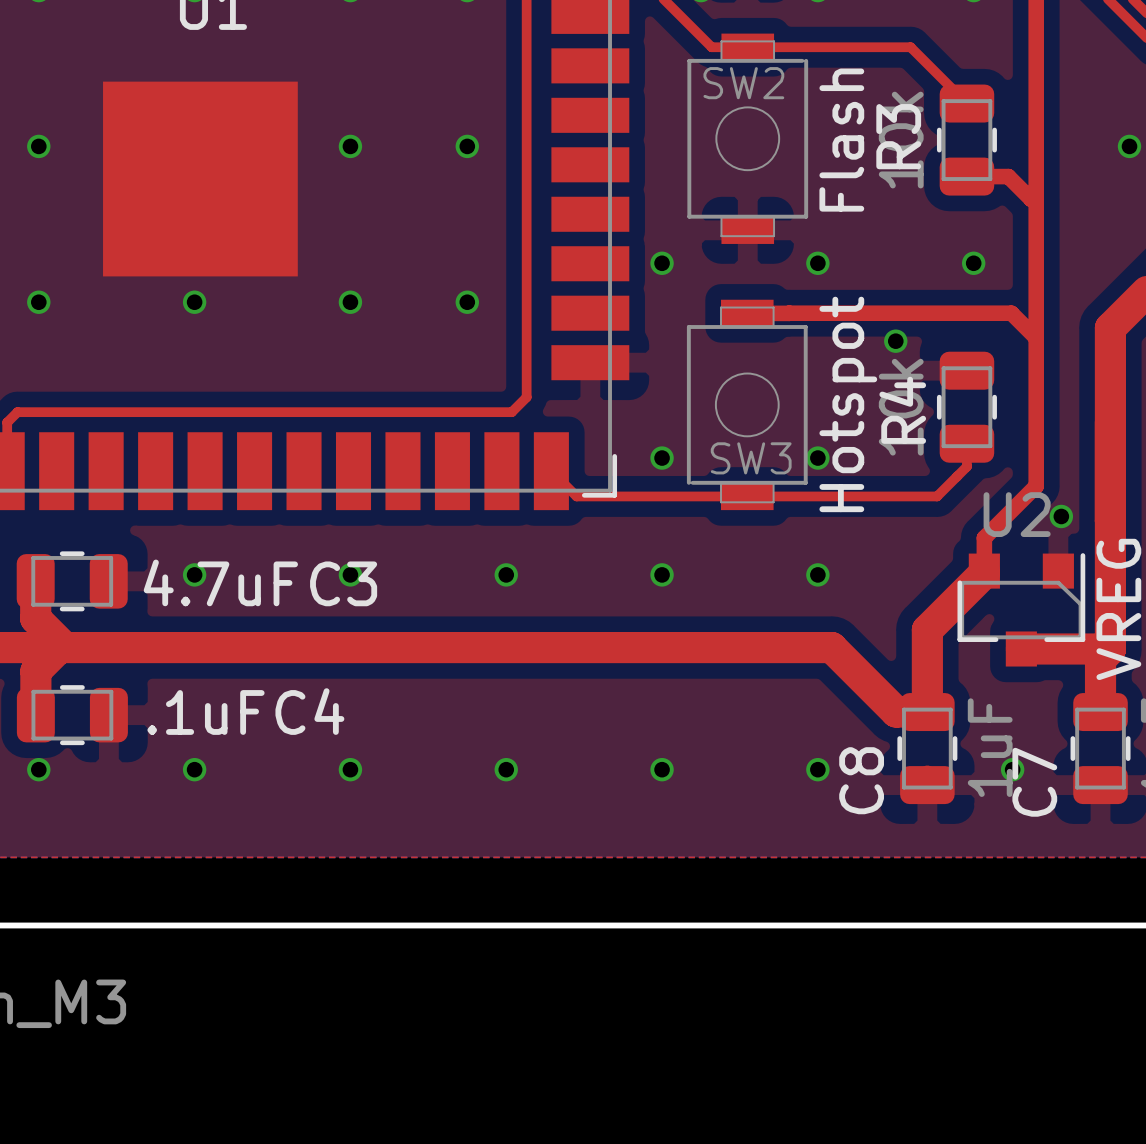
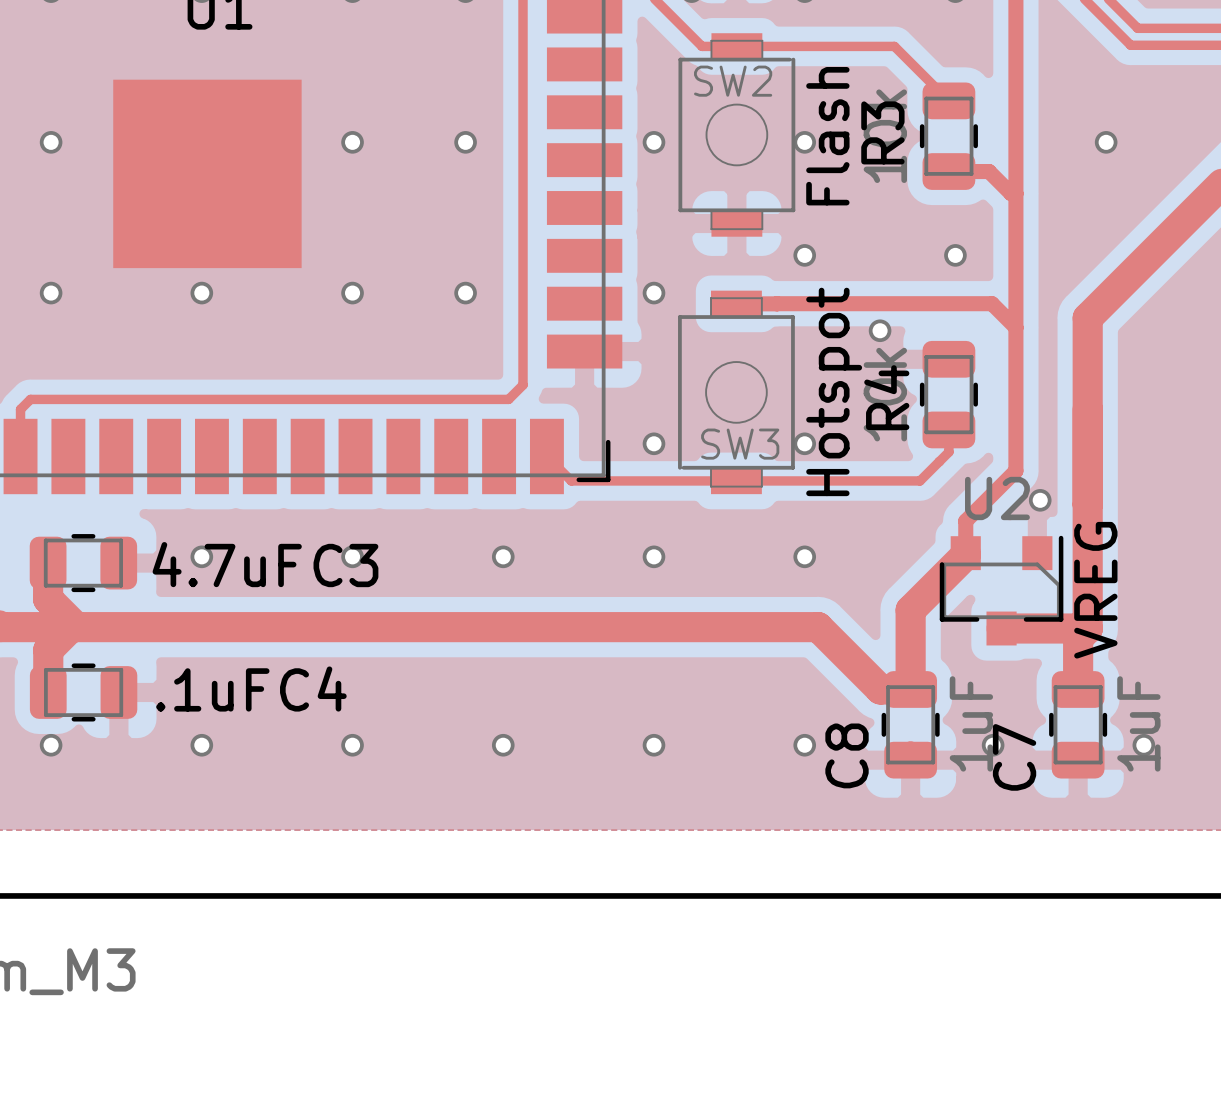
via: none -> (653, 142)
via: none -> (804, 142)
via position: (662, 263) -> (653, 293)

